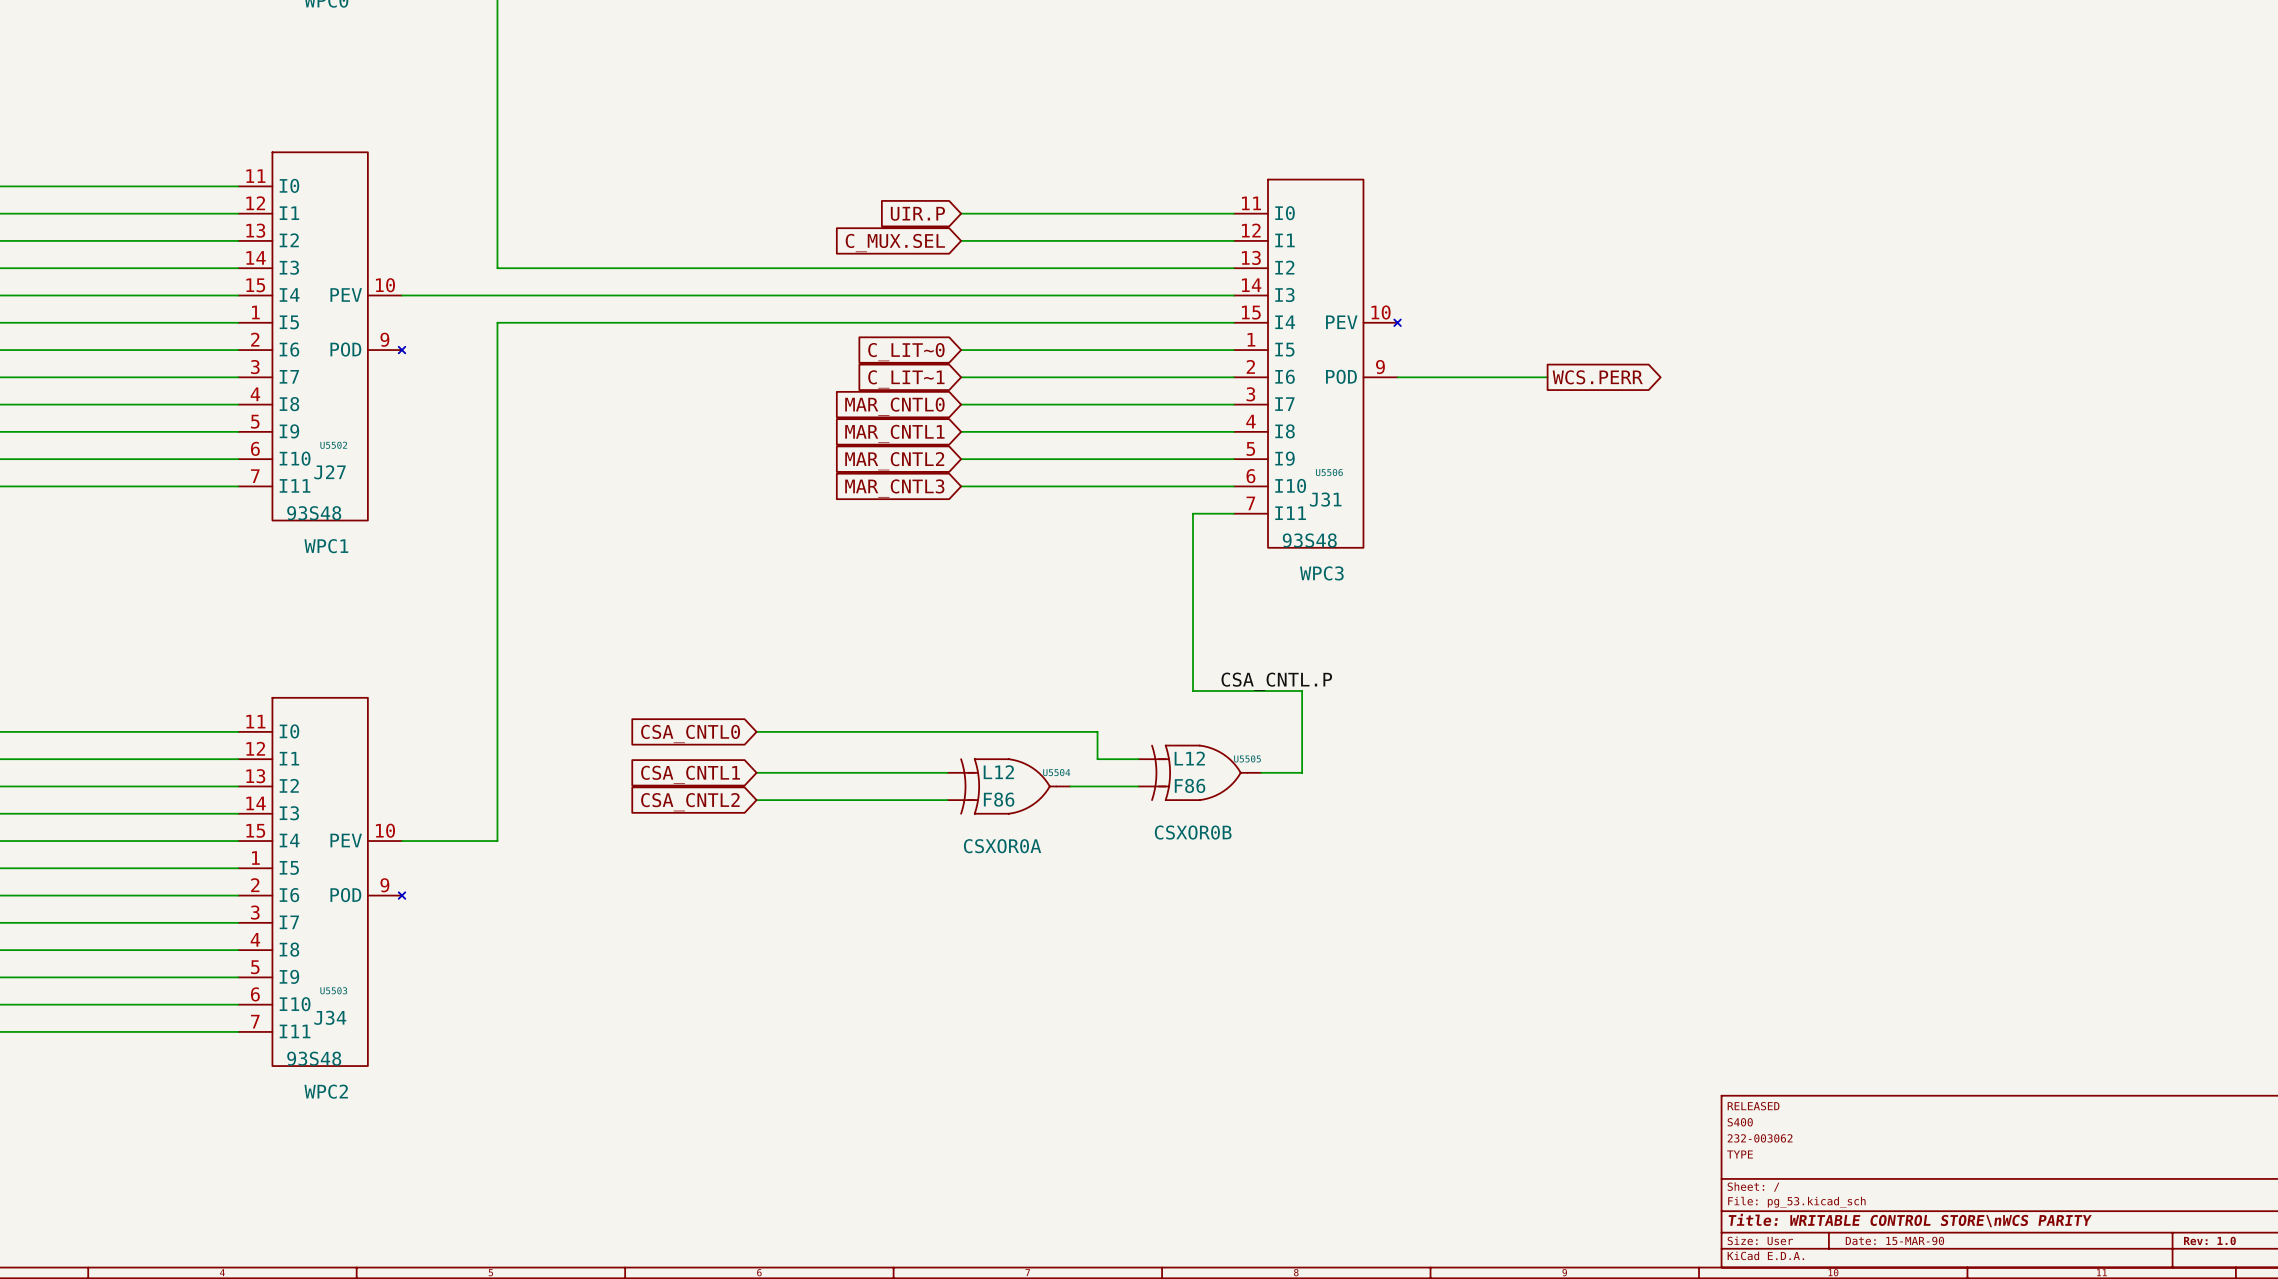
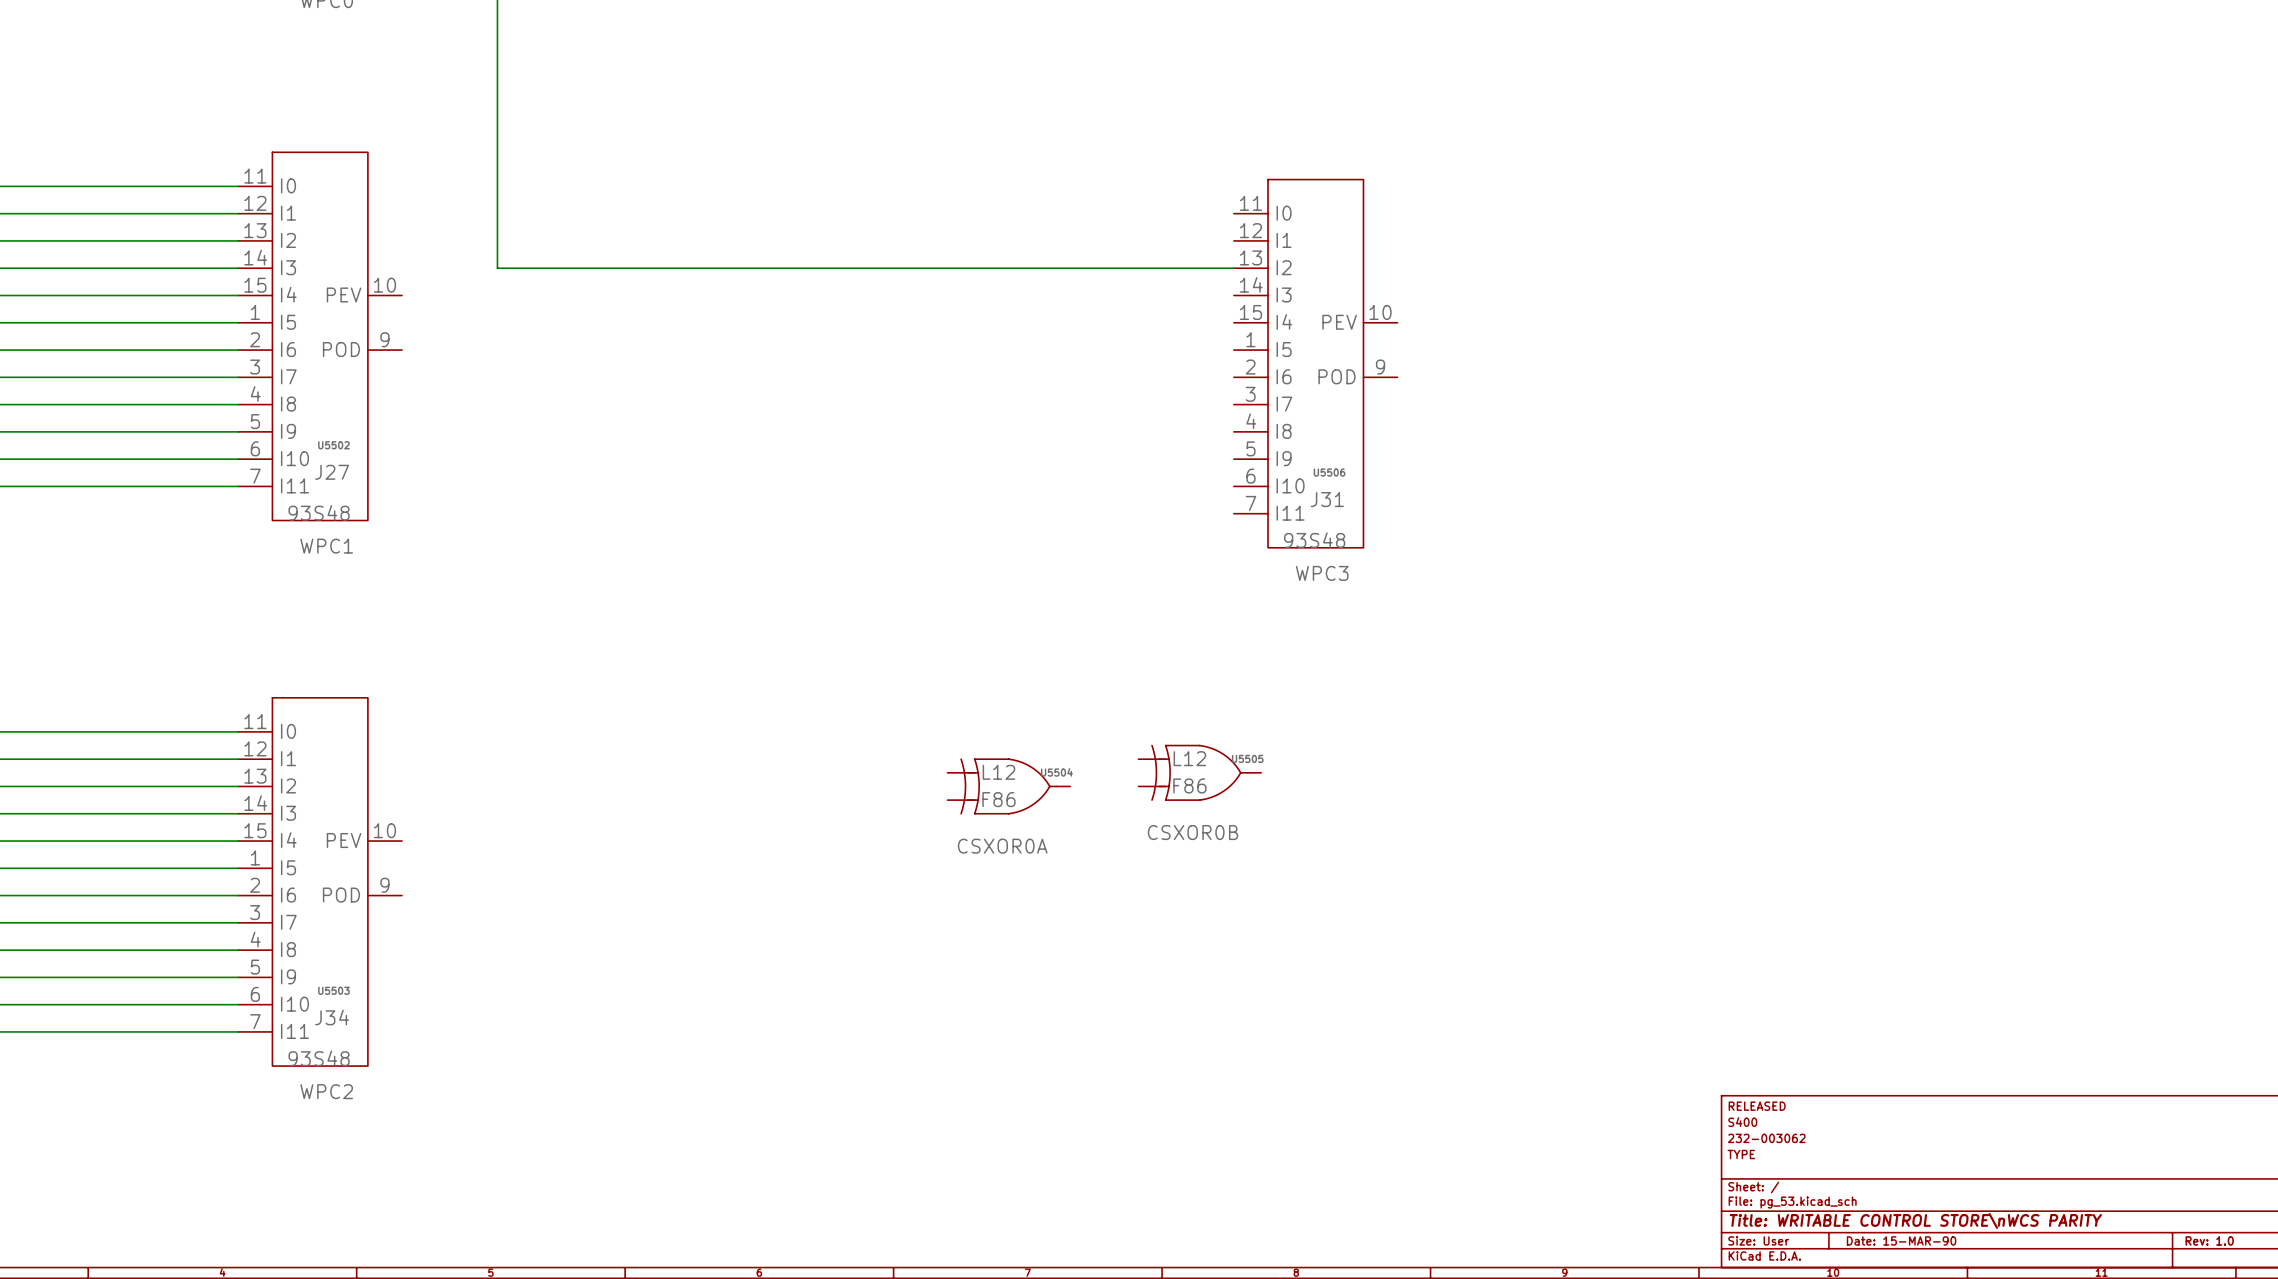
global label: UIR.P (917, 213) -> none
wire: (961, 213) (1233, 213) -> none
wire: (961, 240) (1233, 240) -> none
global label: C_MUX.SEL (895, 243) -> none
wire: (401, 295) (1233, 295) -> none
wire: (1233, 322) (497, 322) (497, 841) (401, 841) -> none
no-connect mark: (1397, 322) -> none
no-connect mark: (401, 350) -> none
wire: (961, 350) (1233, 350) -> none
global label: C_LIT~0 (906, 352) -> none
wire: (961, 377) (1233, 377) -> none
wire: (1397, 377) (1547, 377) -> none
global label: WCS.PERR (1597, 377) -> none
global label: C_LIT~1 (906, 379) -> none
wire: (961, 404) (1233, 404) -> none
global label: MAR_CNTL0 (894, 406) -> none
wire: (961, 431) (1233, 431) -> none
global label: MAR_CNTL1 (894, 433) -> none
wire: (961, 459) (1233, 459) -> none
global label: MAR_CNTL2 (894, 461) -> none
wire: (961, 486) (1233, 486) -> none
global label: MAR_CNTL3 (894, 488) -> none
wire: (1233, 513) (1192, 513) (1192, 691) (1302, 691) (1302, 772) (1261, 772) -> none
label: CSA_CNTL.P (1276, 681) -> none
wire: (756, 731) (1097, 731) (1097, 759) (1138, 759) -> none
global label: CSA_CNTL0 (690, 733) -> none
wire: (756, 772) (947, 772) -> none
global label: CSA_CNTL1 (690, 774) -> none
wire: (1070, 786) (1138, 786) -> none
wire: (756, 800) (947, 800) -> none
global label: CSA_CNTL2 (690, 802) -> none
no-connect mark: (401, 895) -> none

